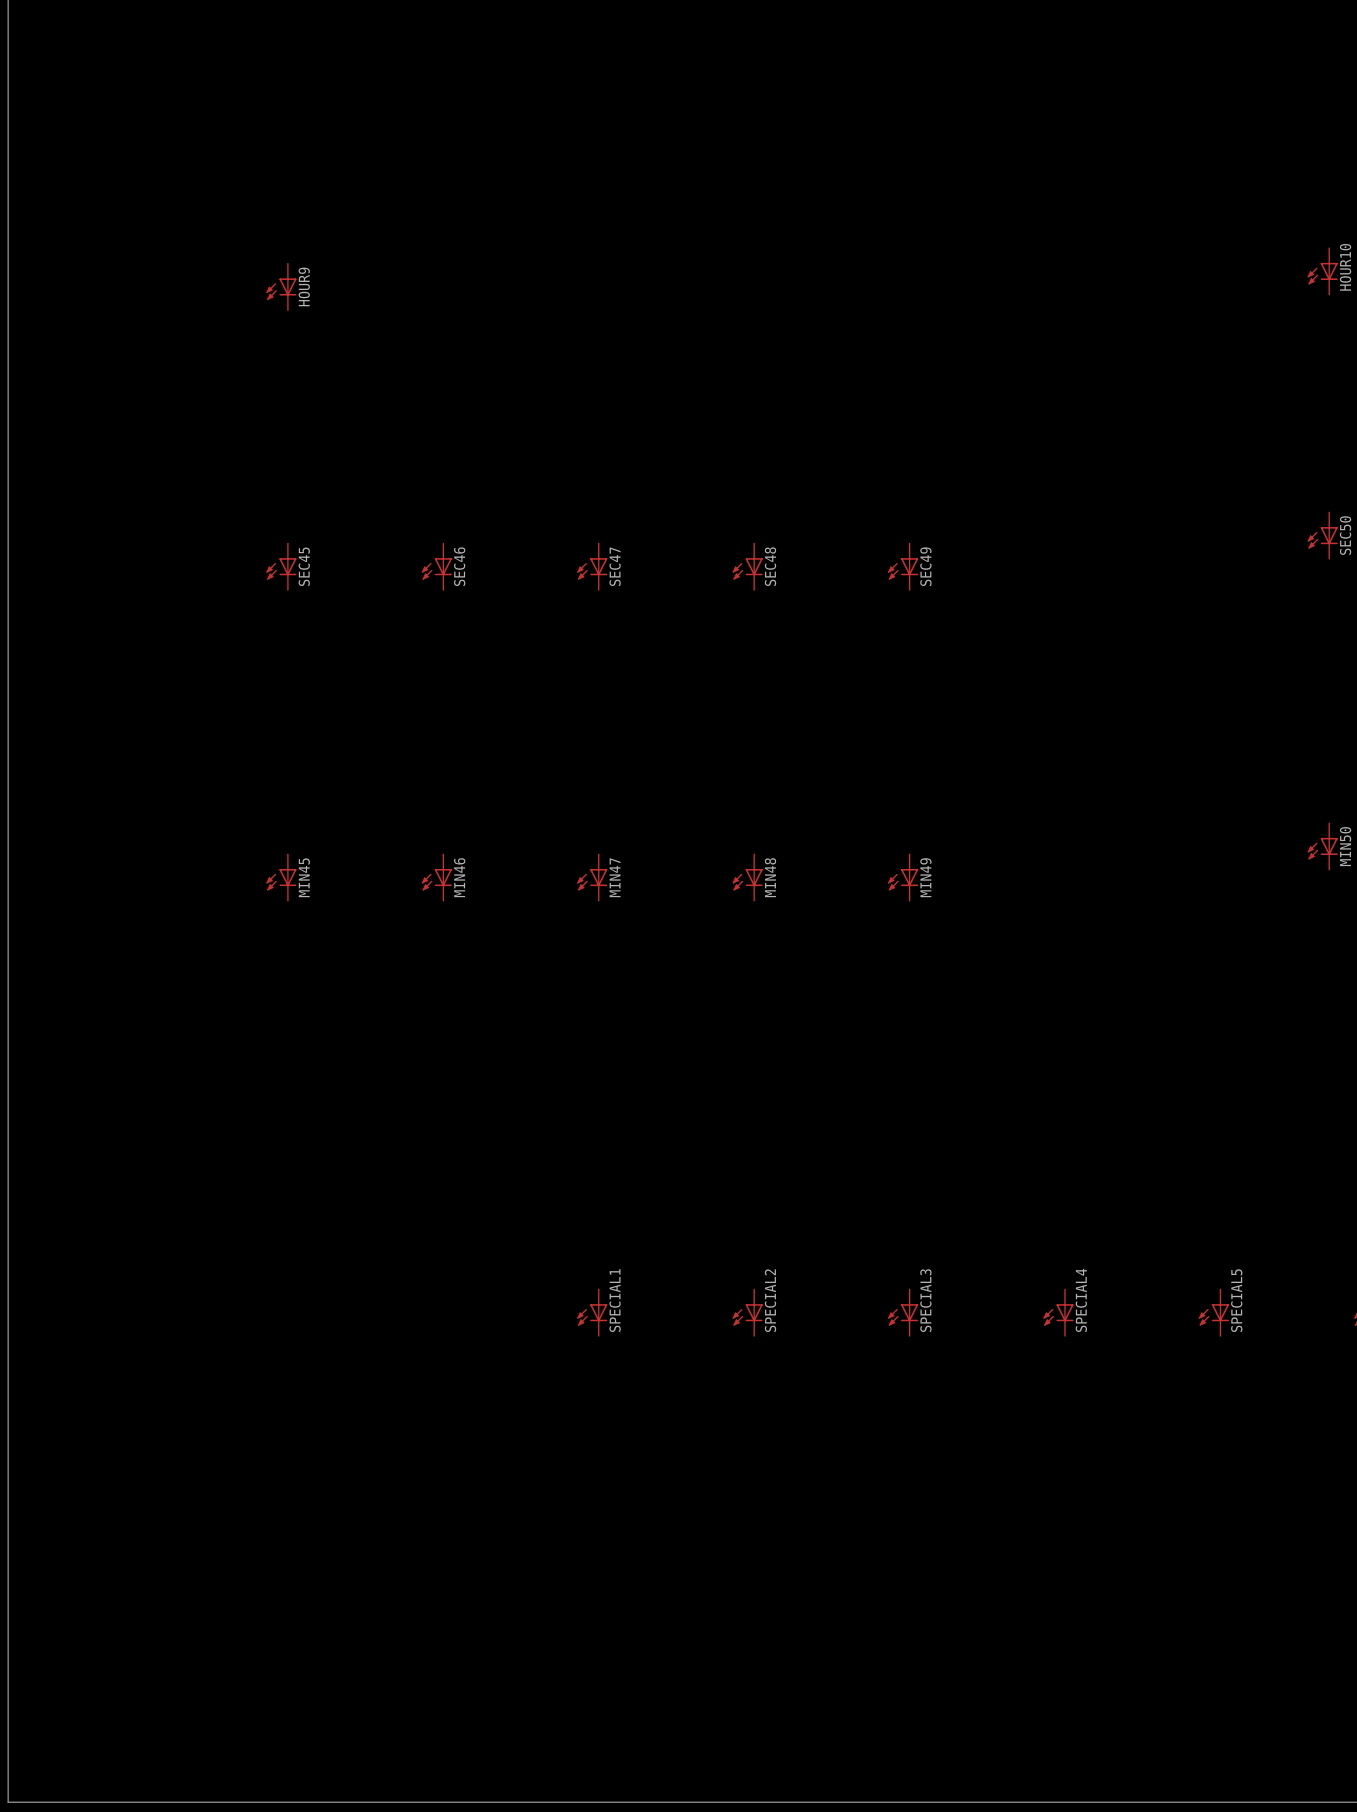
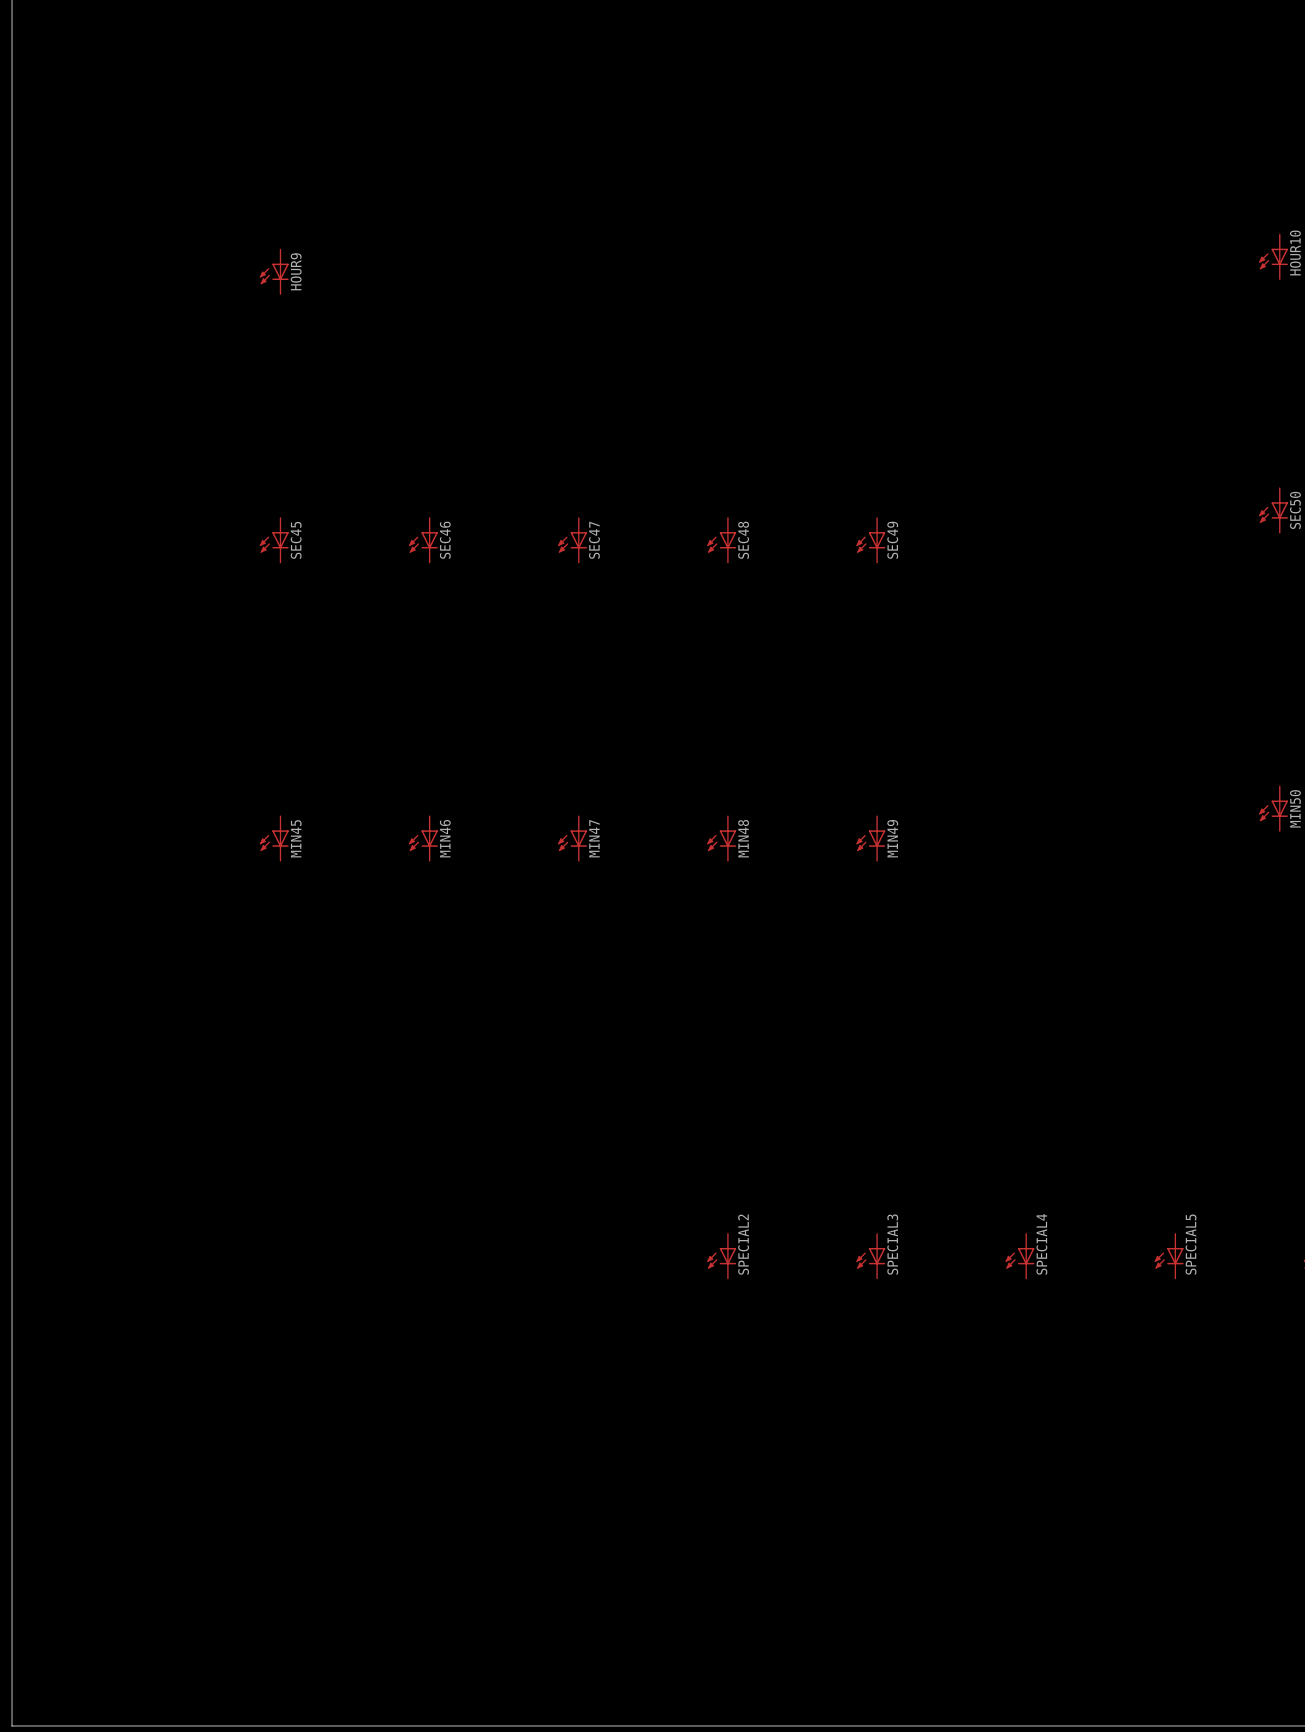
SPECIAL1: (592, 1312) -> none

